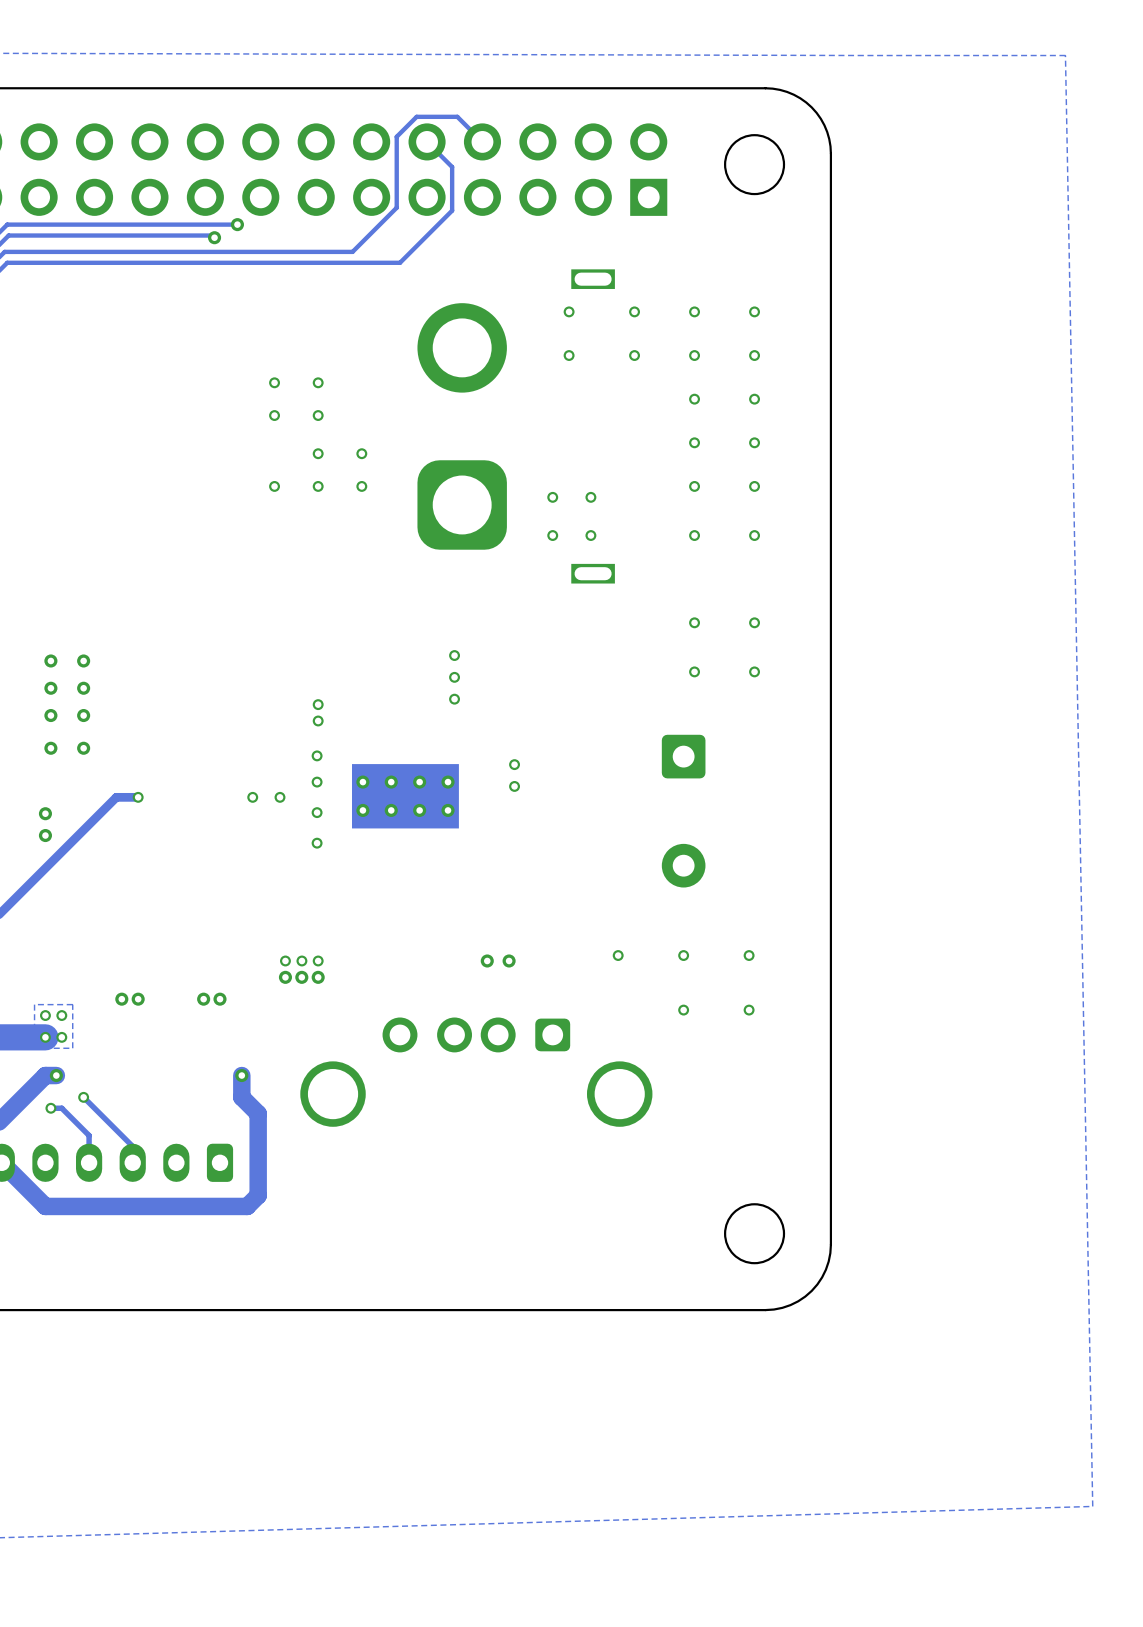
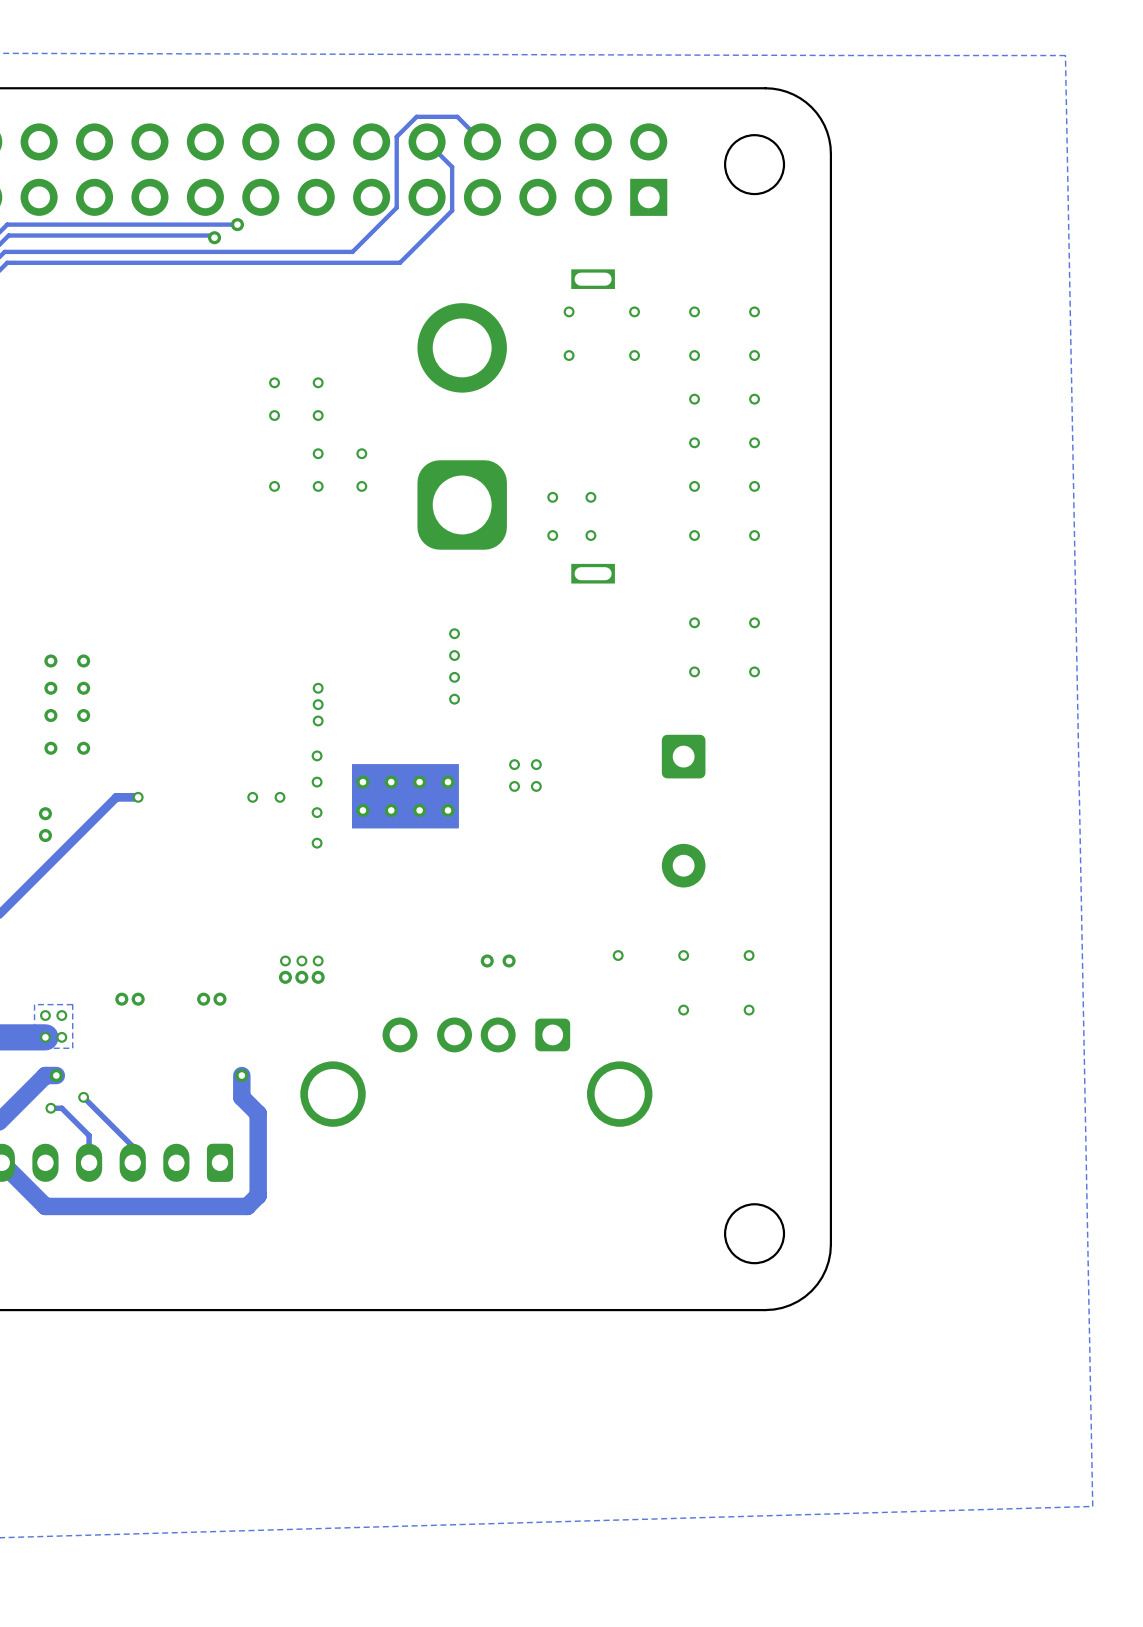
via: none -> (454, 633)
via: none -> (318, 688)
via: none -> (536, 764)
via: none -> (536, 786)

